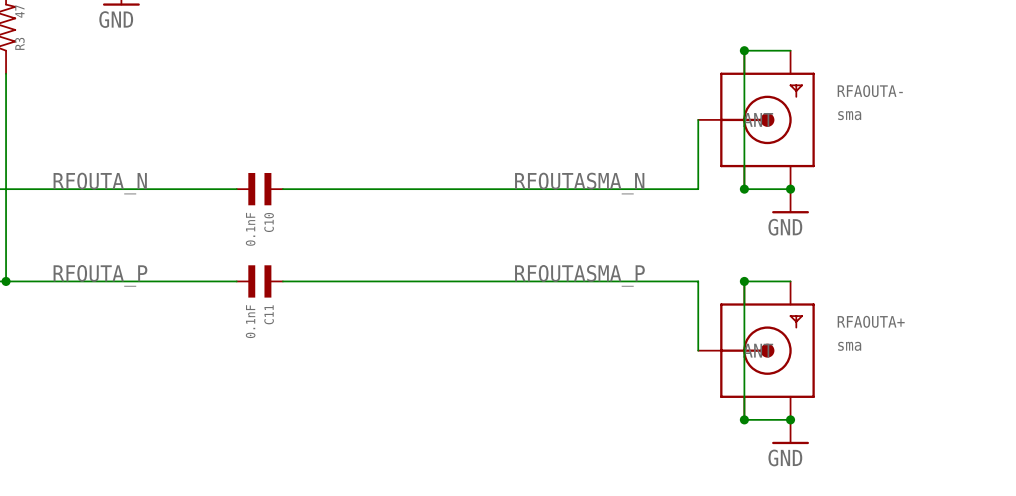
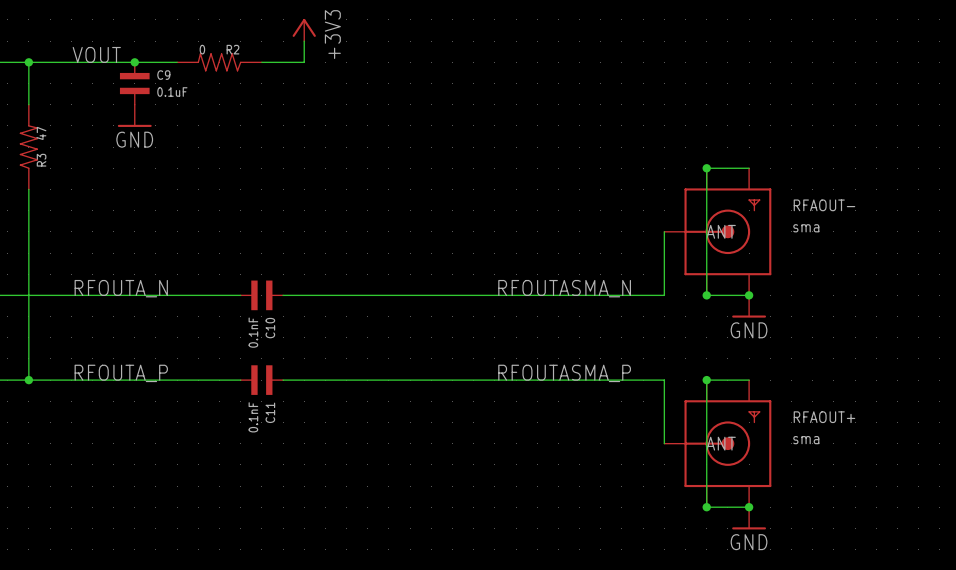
RFAOUTA- name: RFAOUTA- (870, 91) -> RFAOUT- (824, 205)
RFAOUTA+ name: RFAOUTA+ (871, 321) -> RFAOUT+ (824, 417)

